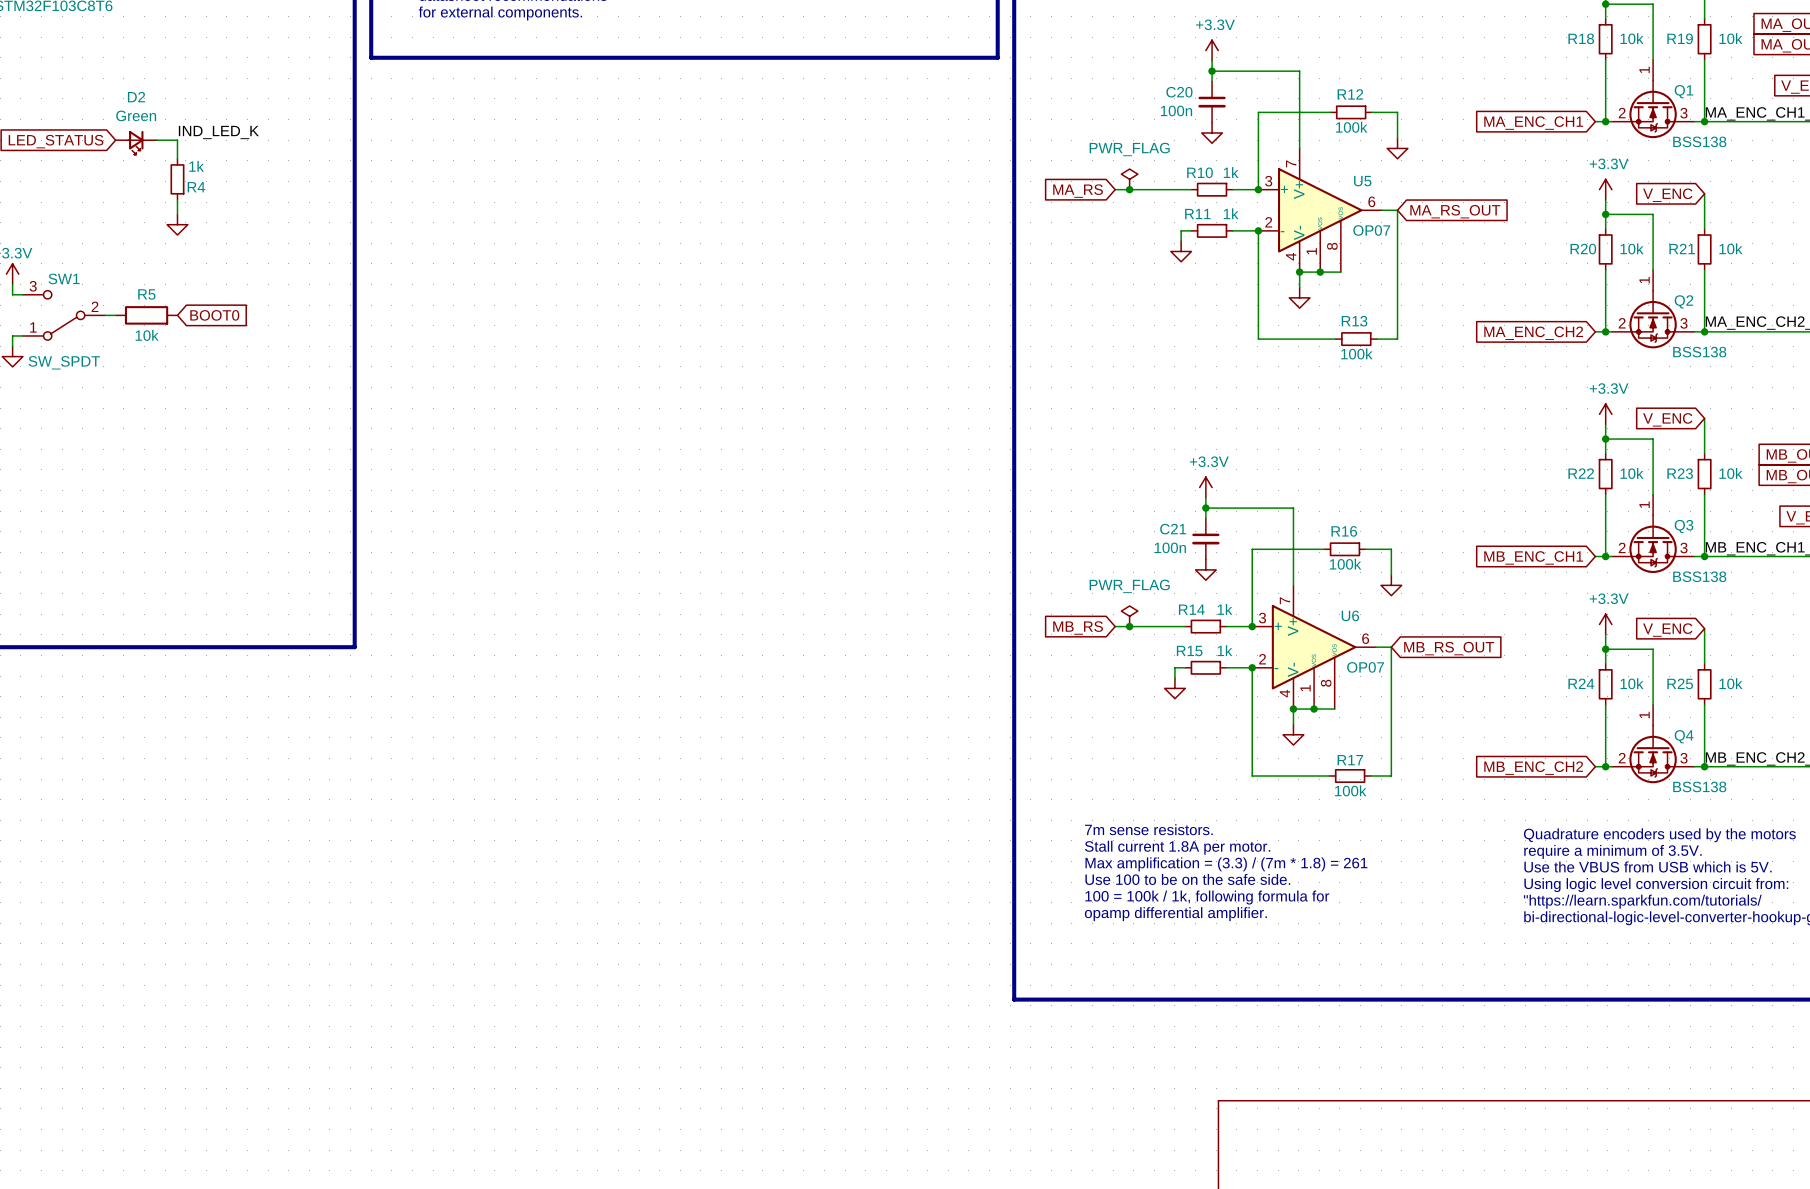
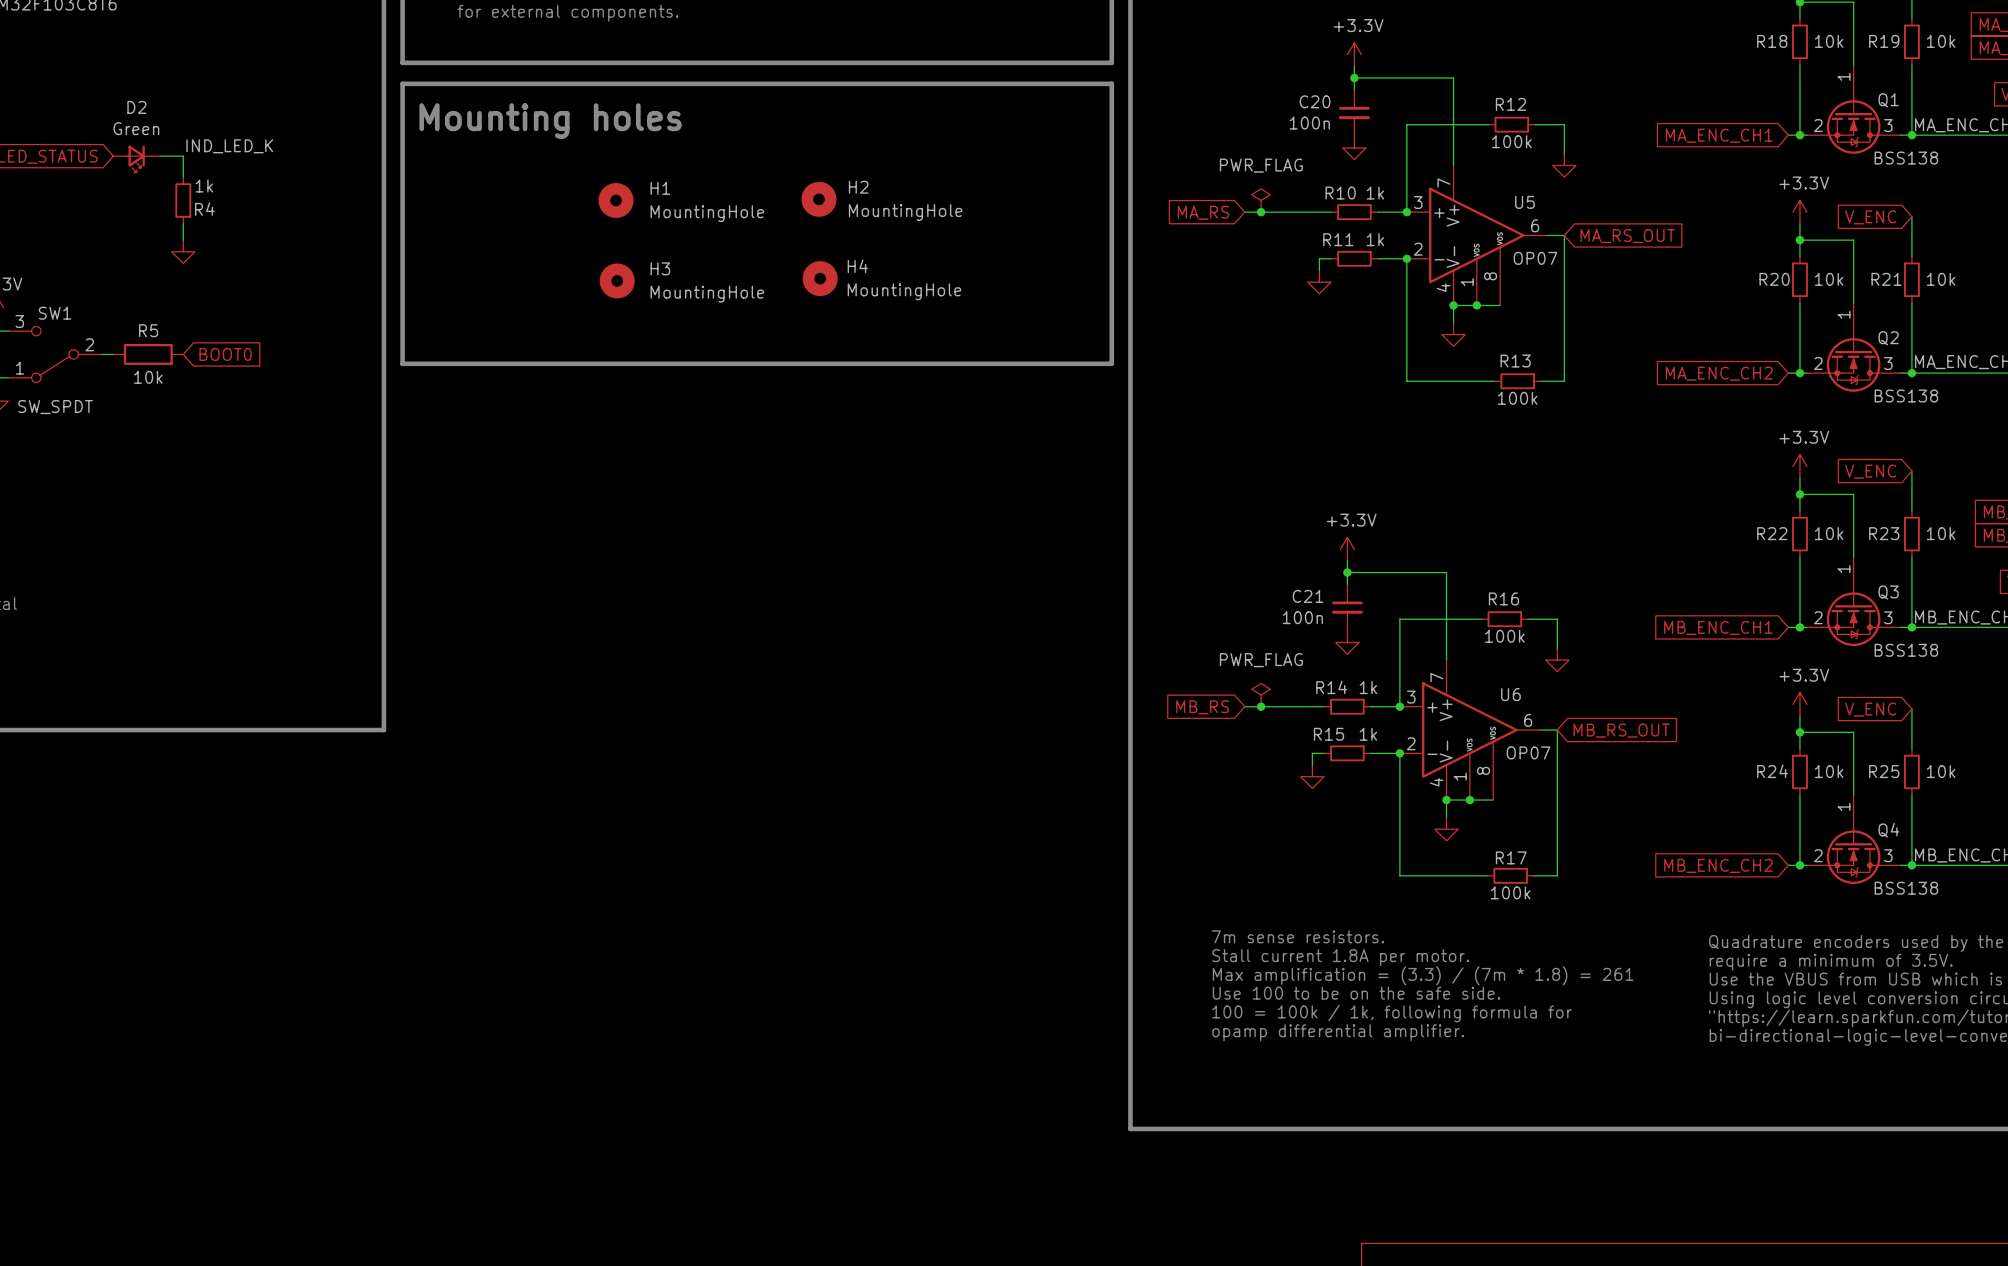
line: none -> (402, 83) (402, 363) (1111, 363) (1111, 83) (402, 83)
text: none -> Mounting holes (550, 121)
H2: none -> MountingHole (819, 199)
H1: none -> MountingHole (616, 200)
H4: none -> MountingHole (820, 278)
H3: none -> MountingHole (617, 280)

